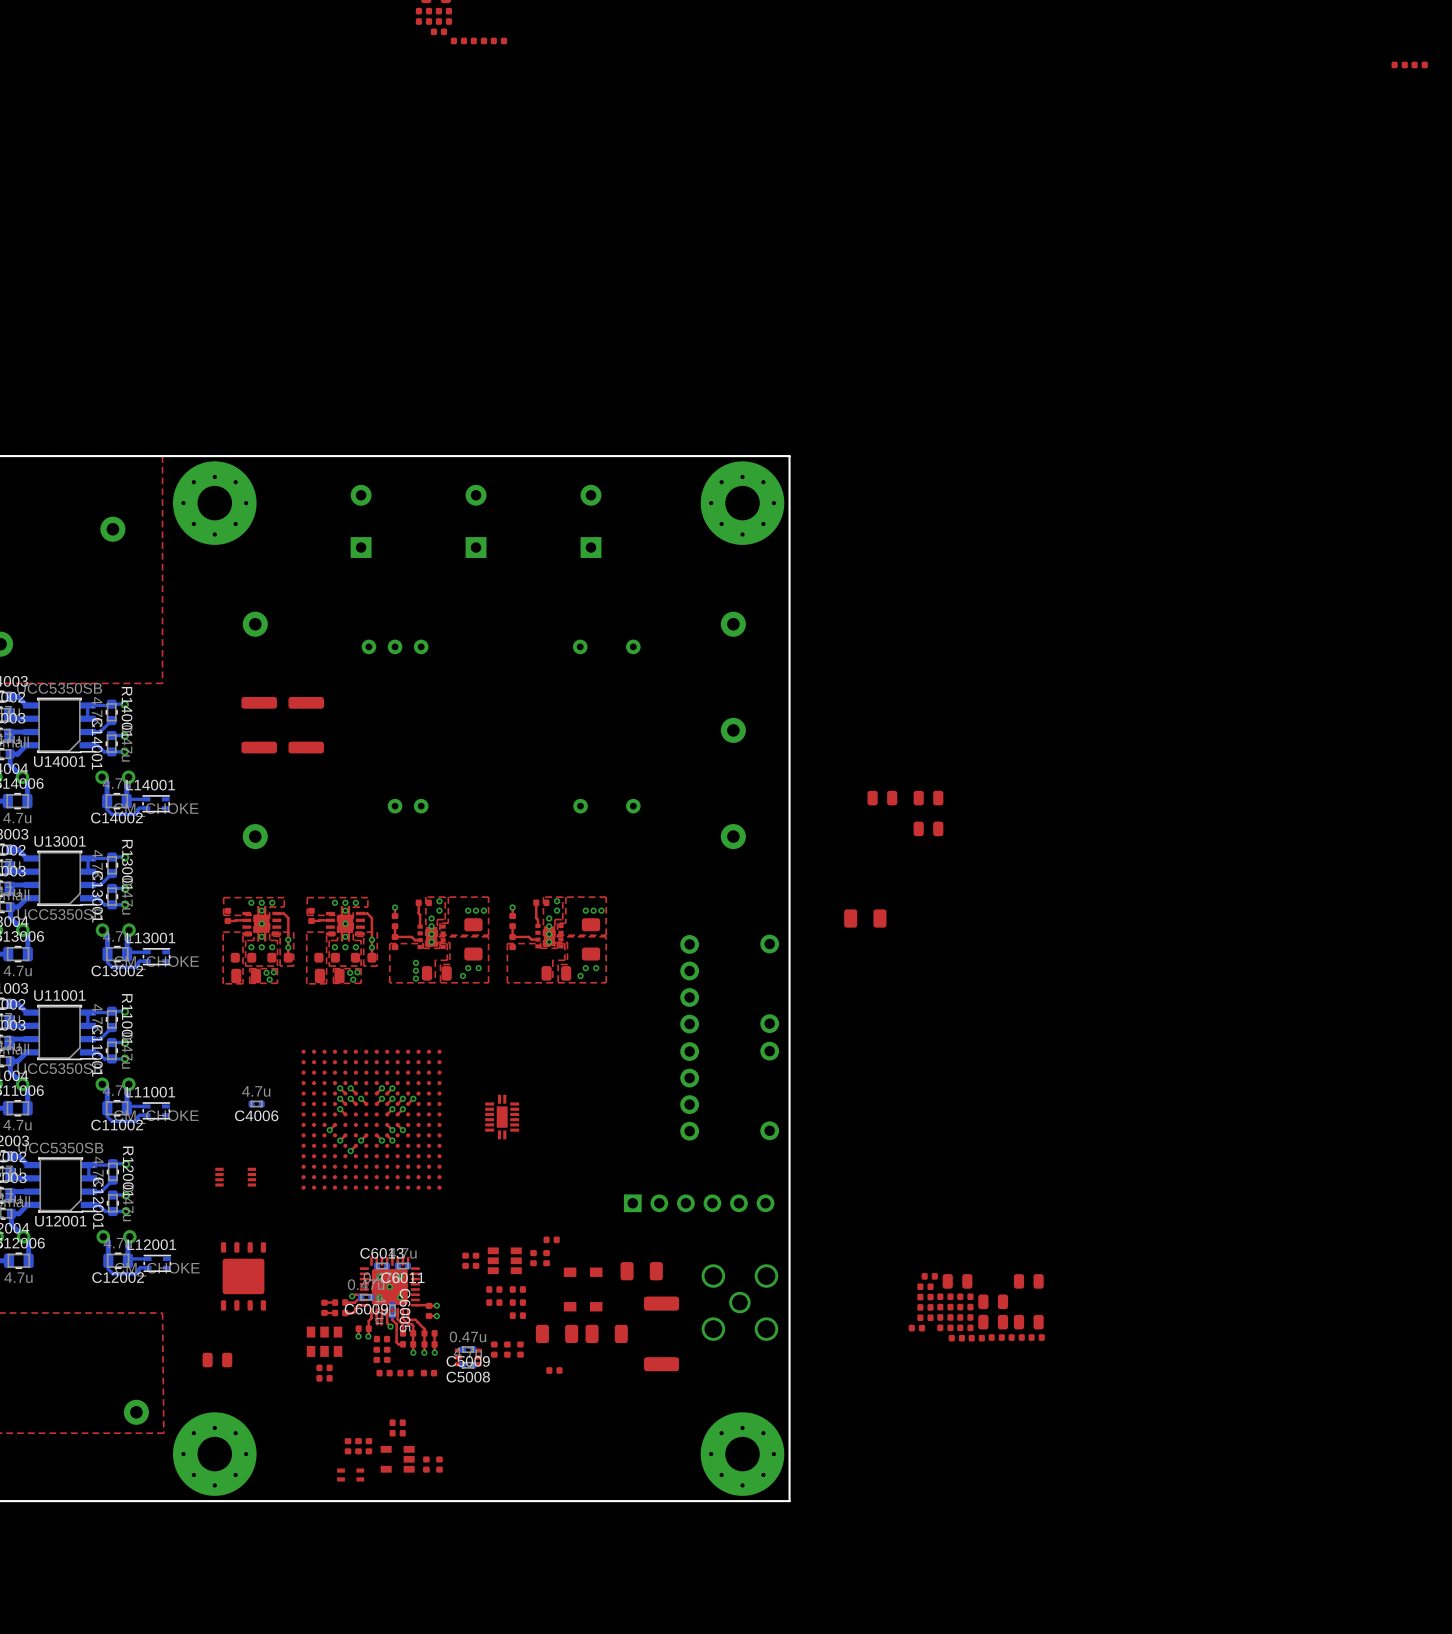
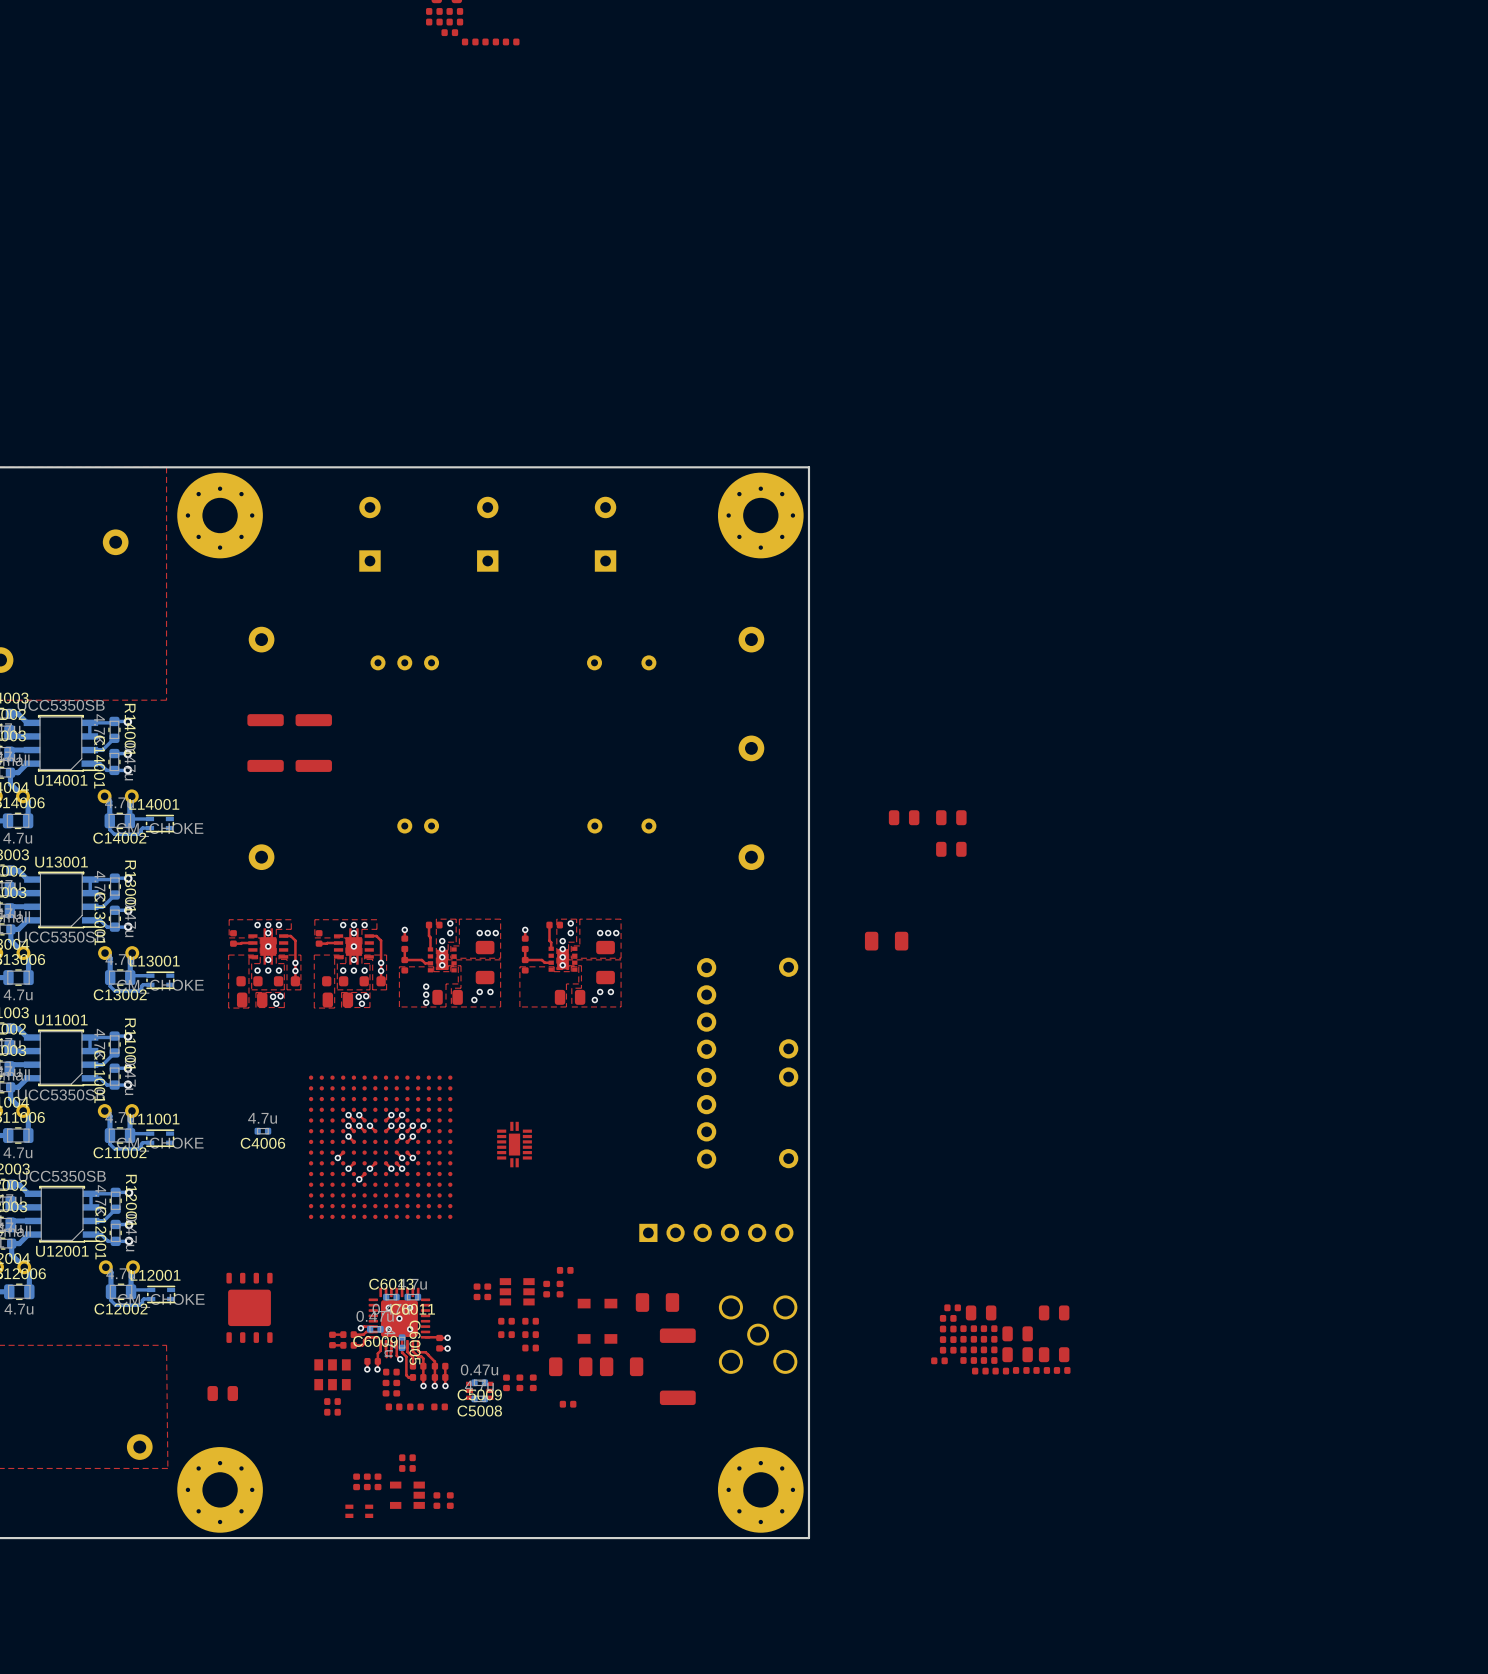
part: (1399, 64) -> none
part: (1419, 64) -> none
part: (235, 1177) -> none

